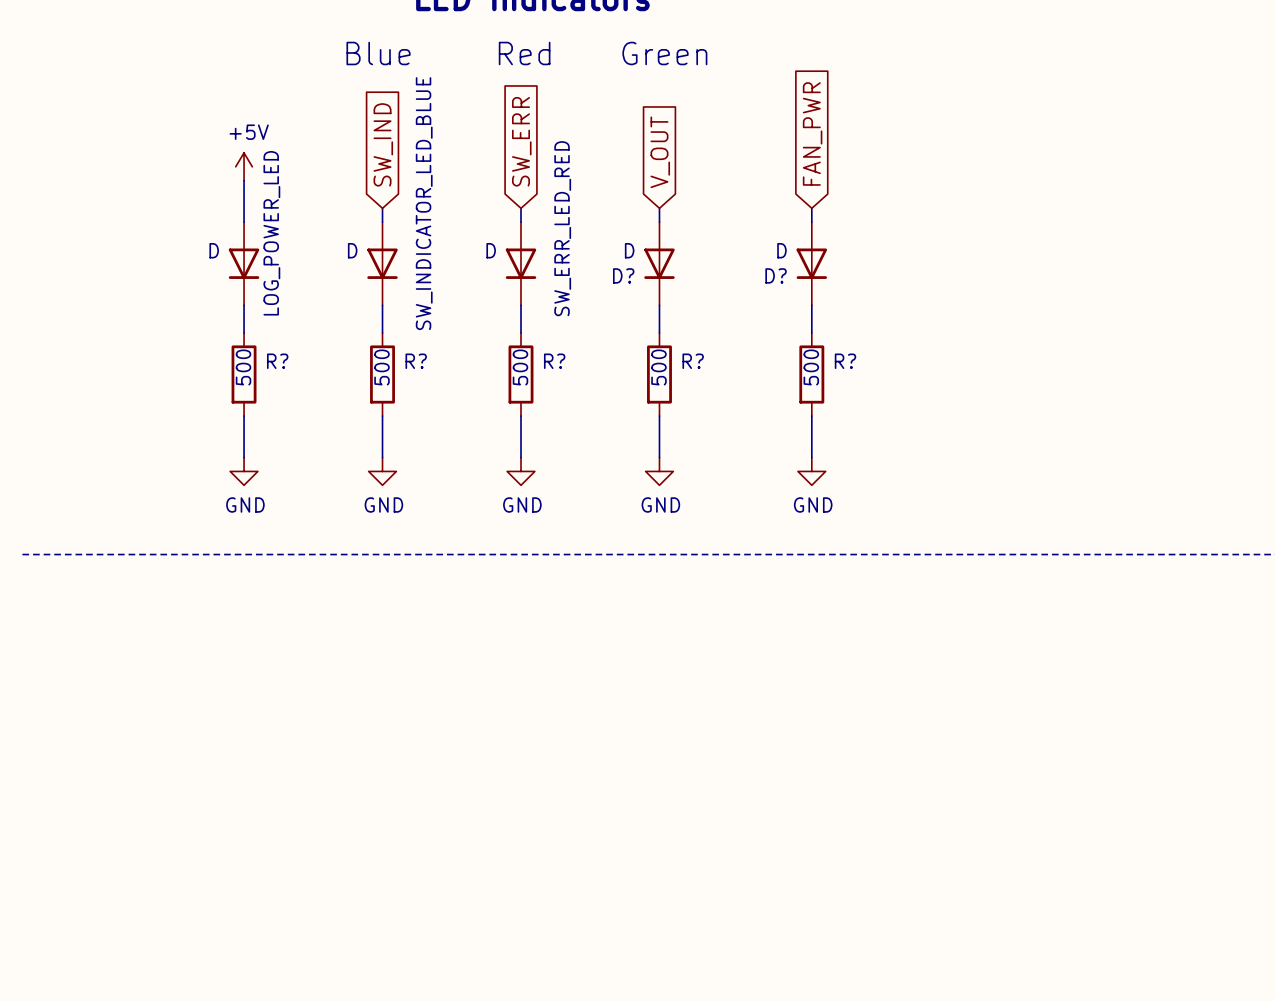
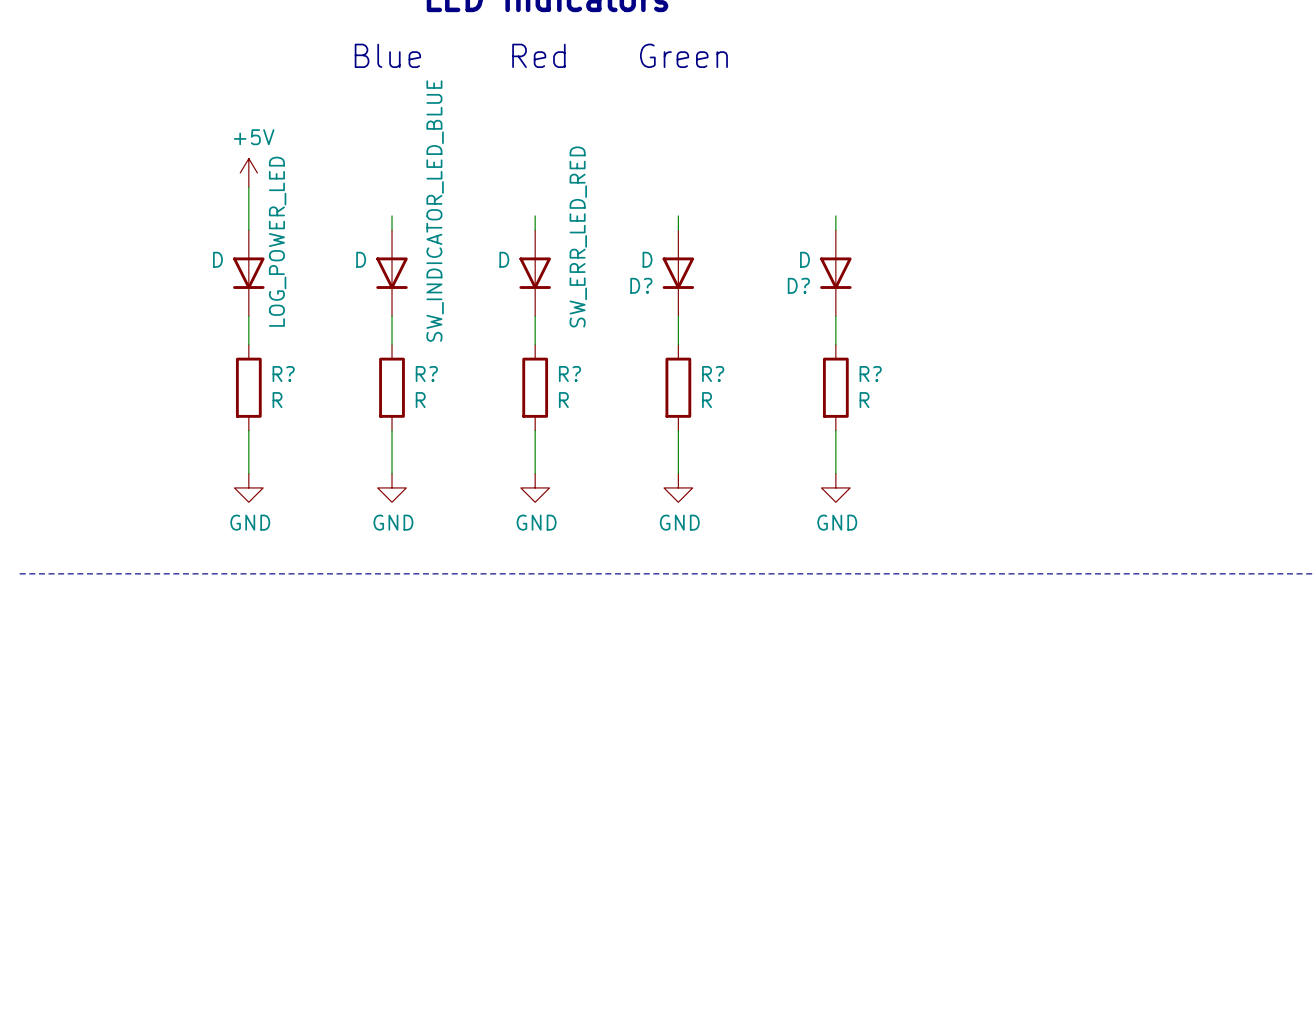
global label: FAN_PWR (812, 133) -> none
global label: SW_ERR (521, 141) -> none
global label: SW_IND (383, 144) -> none
global label: V_OUT (660, 152) -> none
R? value: 500 (243, 367) -> R (277, 400)
R? value: 500 (382, 367) -> R (420, 400)
R? value: 500 (520, 367) -> R (563, 400)
R? value: 500 (658, 367) -> R (707, 400)
R? value: 500 (811, 367) -> R (864, 400)

